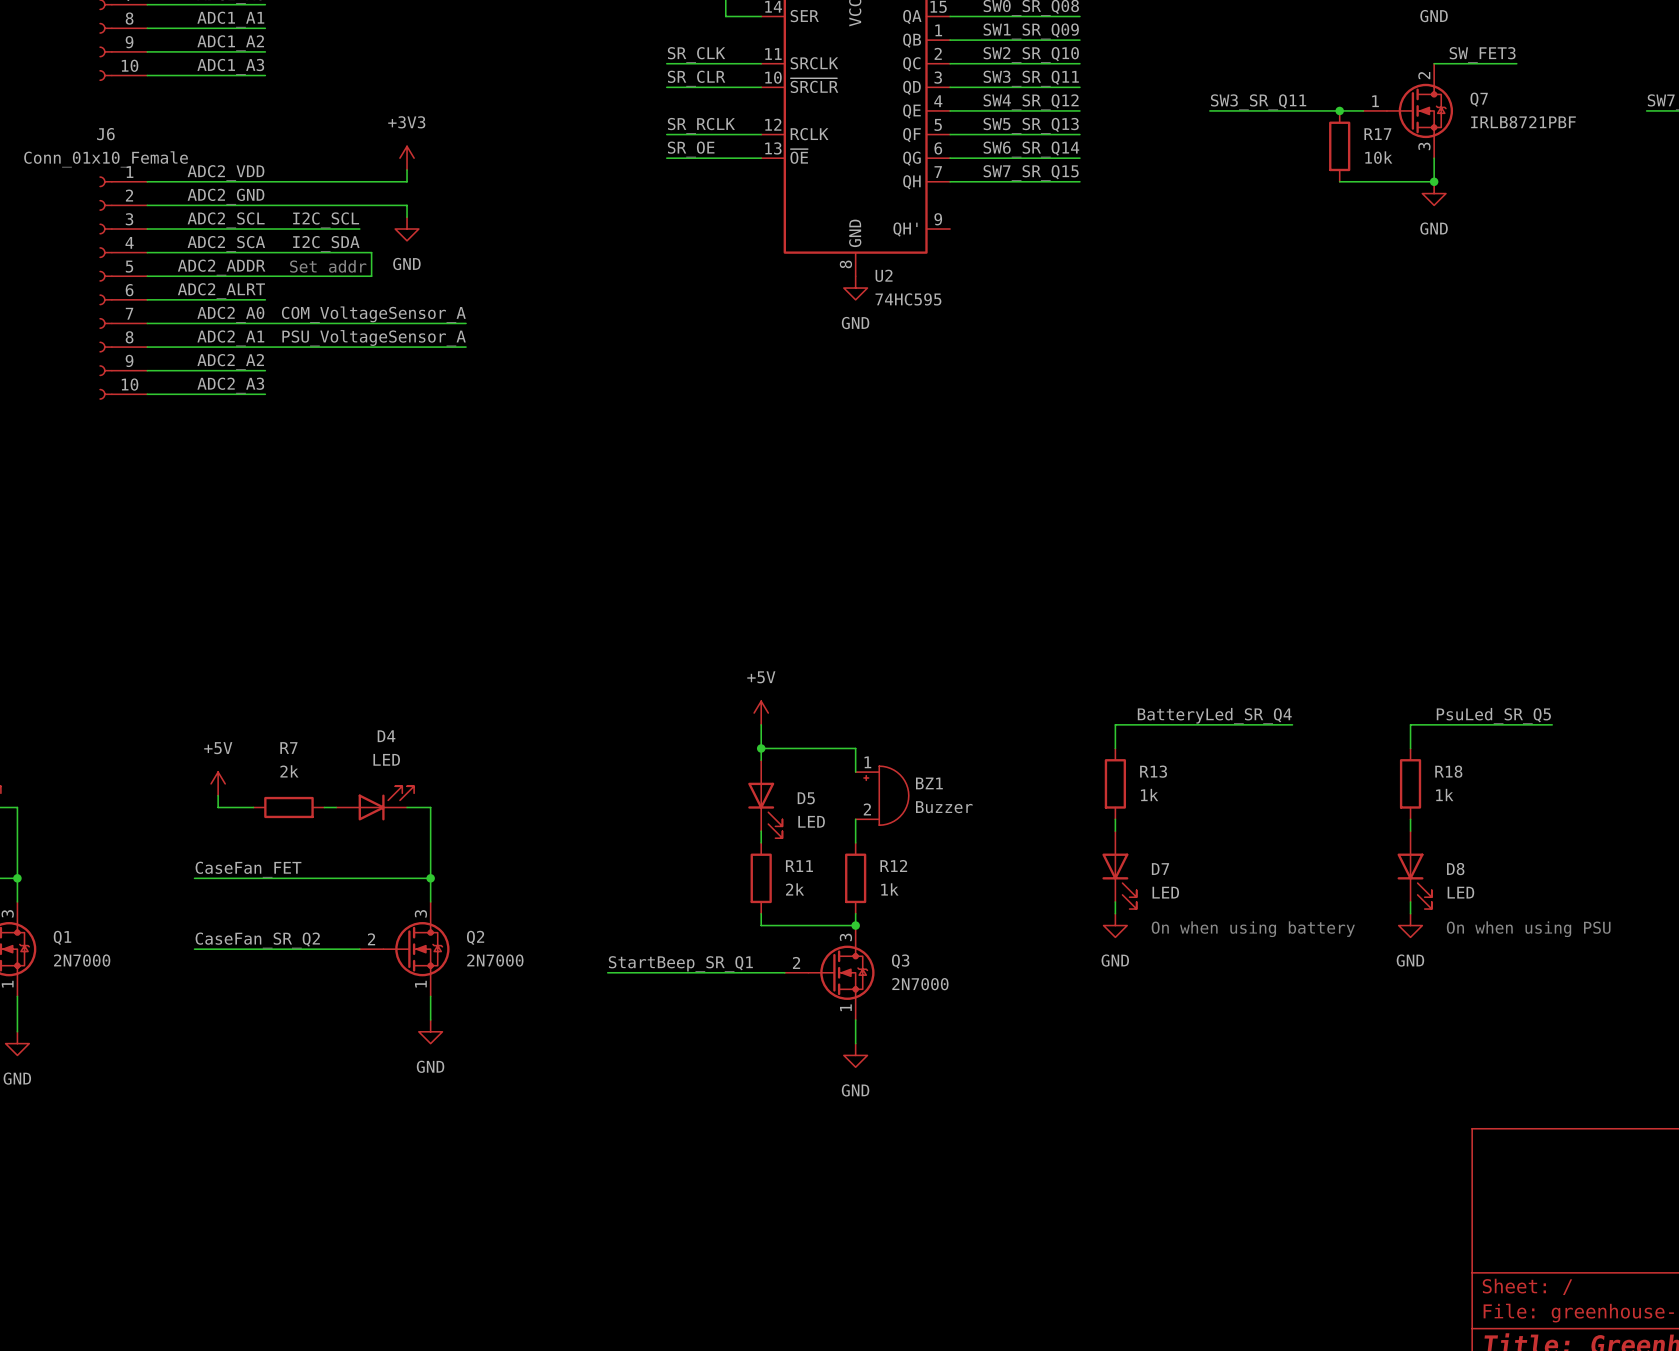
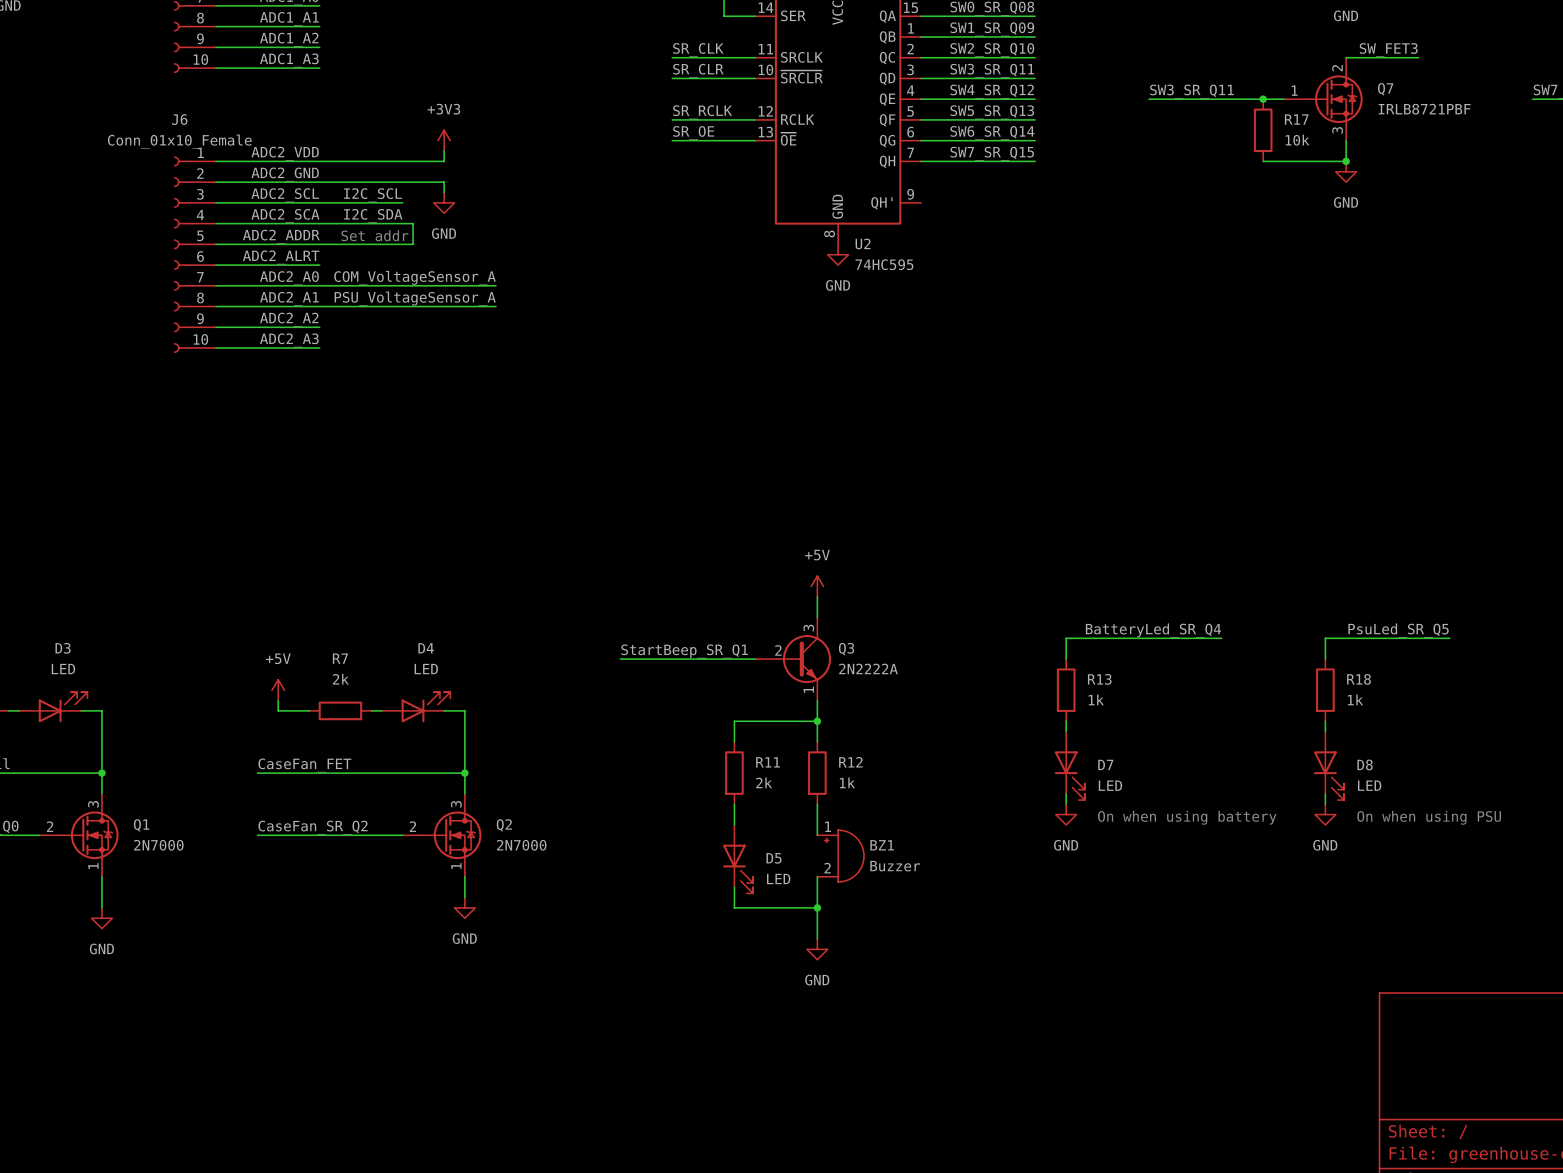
power symbol position: +5V (761, 713) -> +5V (817, 586)
wire: (761, 724) (761, 760) -> (817, 804) (817, 835)
wire: (761, 748) (855, 748) (855, 772) -> (755, 659) (620, 659)
junction: (761, 748) -> none
wire: none -> (817, 700) (817, 742)
BZ1 position: (882, 795) -> (840, 856)
D5 position: (765, 799) -> (738, 859)
wire: none -> (817, 721) (734, 721) (734, 742)
junction: none -> (817, 721)
wire: (855, 819) (855, 842) -> (817, 596) (817, 617)
wire: (761, 831) (761, 842) -> none
R11 position: (761, 878) -> (734, 773)
R12 position: (855, 878) -> (817, 773)
wire: (761, 913) (761, 925) (855, 925) (855, 913) -> none
Q3 symbol: [784, 925, 875, 1021] -> [755, 617, 832, 701]
junction: (855, 925) -> none
label position: StartBeep_SR_Q1 (680, 964) -> StartBeep_SR_Q1 (684, 651)
wire: (607, 972) (784, 972) -> none
Q3 value: 2N7000 (920, 984) -> 2N2222A (868, 668)
wire: none -> (817, 876) (817, 938)
wire: none -> (734, 887) (734, 907) (817, 907)
wire: (855, 1020) (855, 1043) -> (734, 804) (734, 824)
junction: none -> (817, 907)
power symbol position: GND (855, 1055) -> GND (817, 949)

